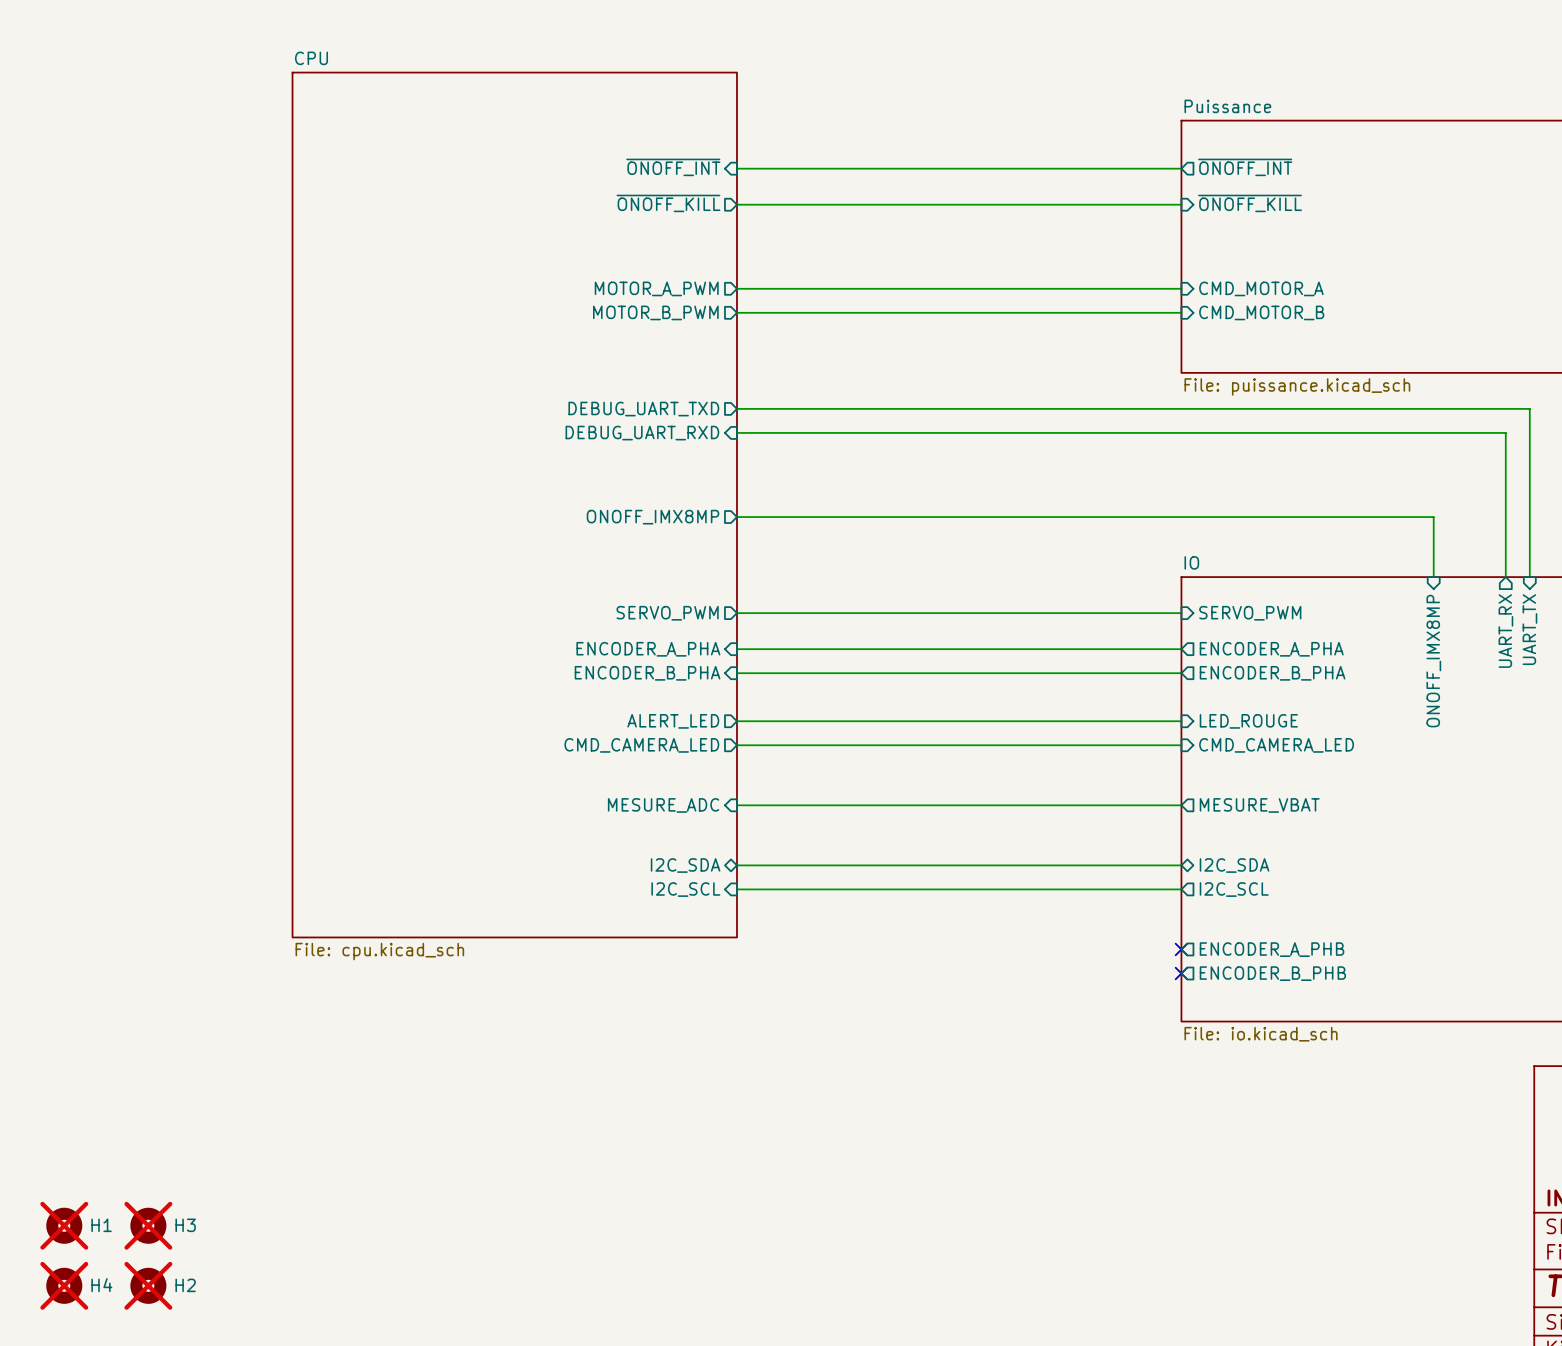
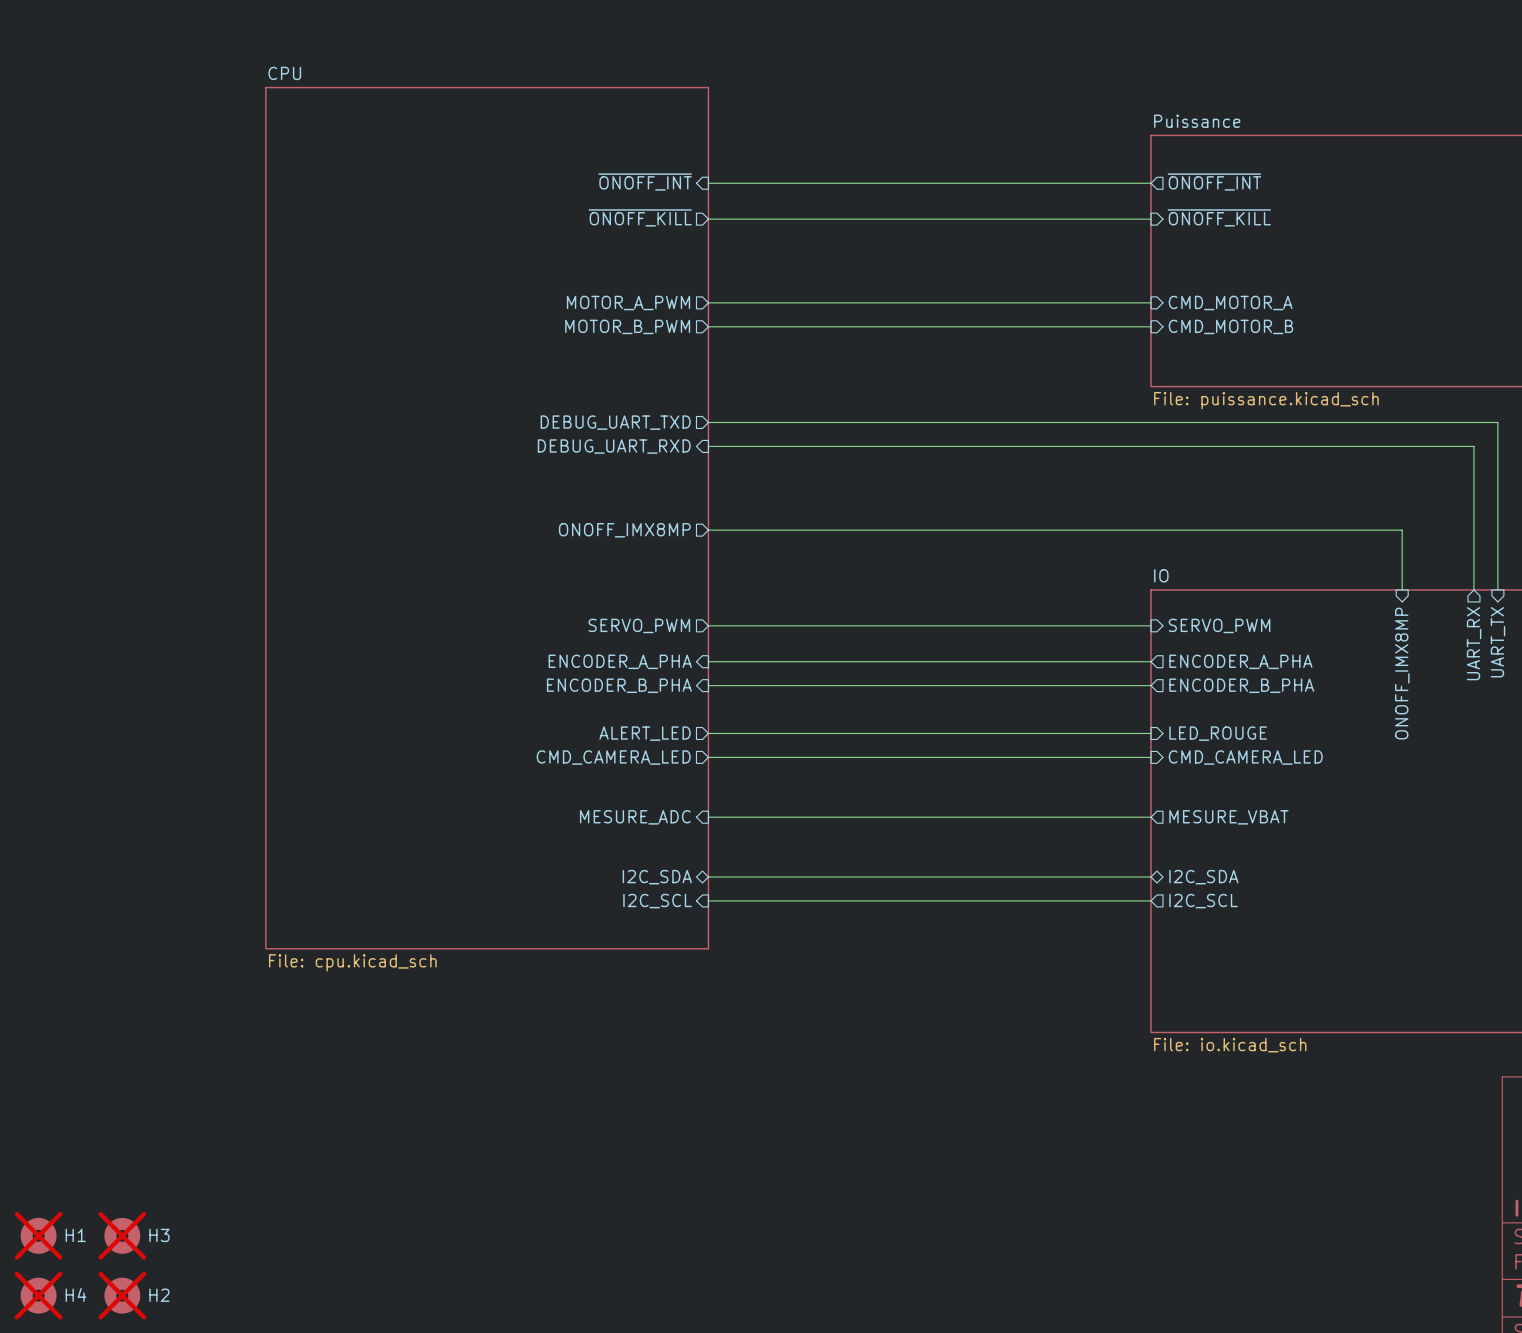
no-connect mark: (1181, 949) -> none
sheet pin: ENCODER_A_PHB (1272, 949) -> none
no-connect mark: (1181, 973) -> none
sheet pin: ENCODER_B_PHB (1272, 973) -> none

